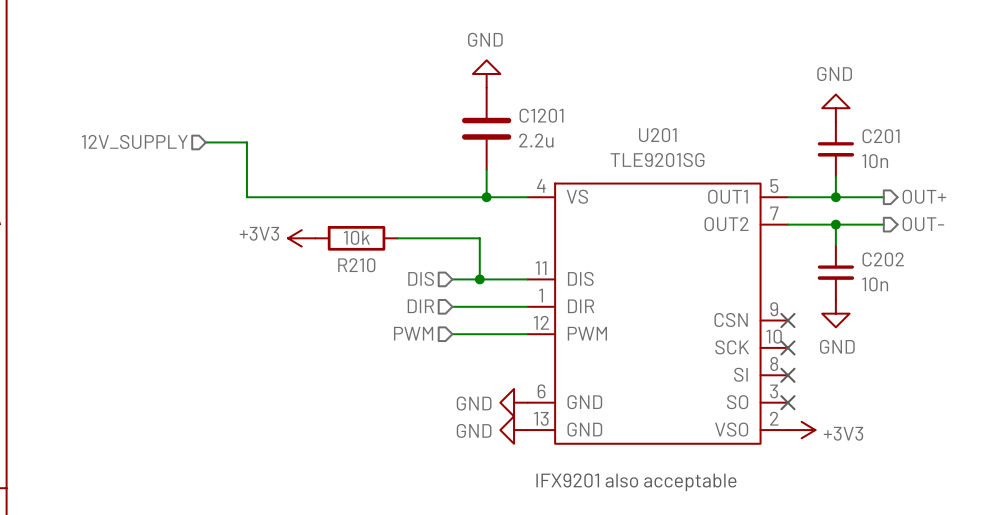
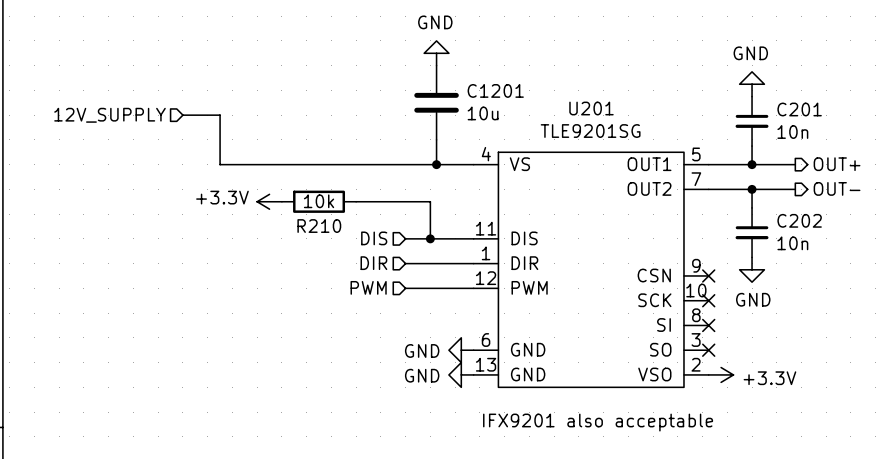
C1201 value: 2.2u (536, 140) -> 10u (483, 113)
power symbol: +3V3 (301, 238) -> +3.3V (269, 201)
power symbol: +3V3 (801, 430) -> +3.3V (721, 374)

